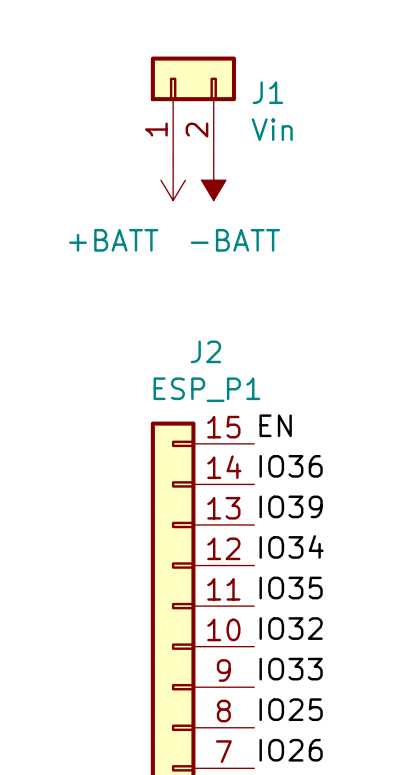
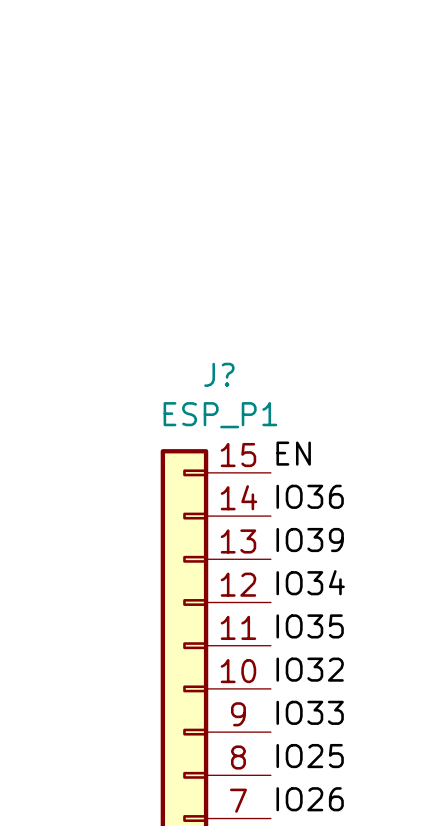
J1: Vin (193, 108) -> none
power symbol: +BATT (173, 180) -> none
power symbol: -BATT (213, 180) -> none
J2 name: J2 (205, 351) -> J? (219, 374)

